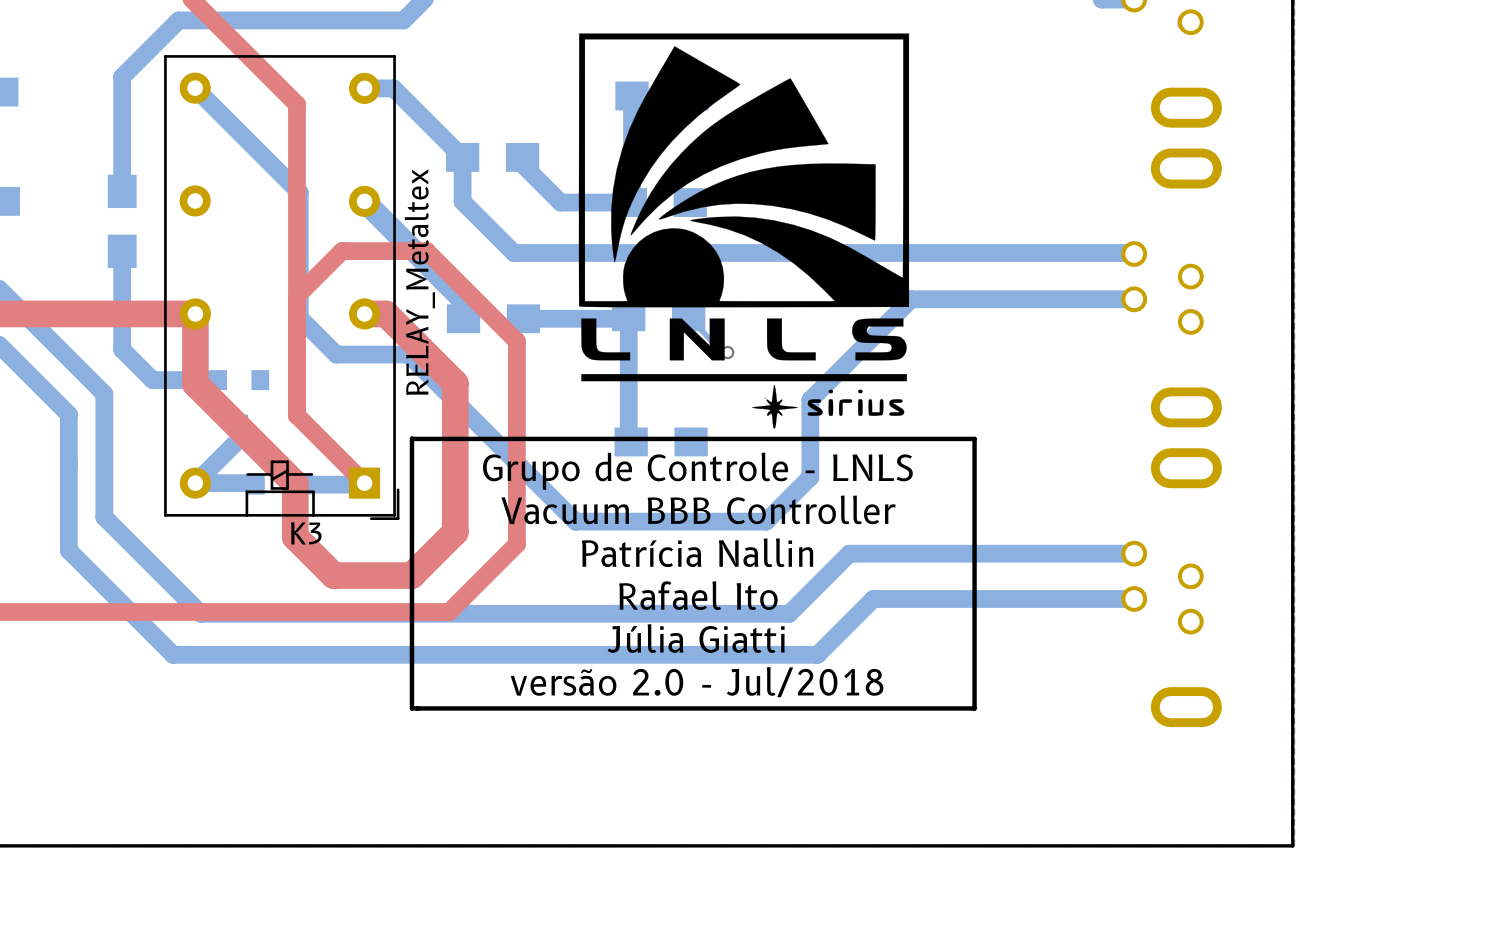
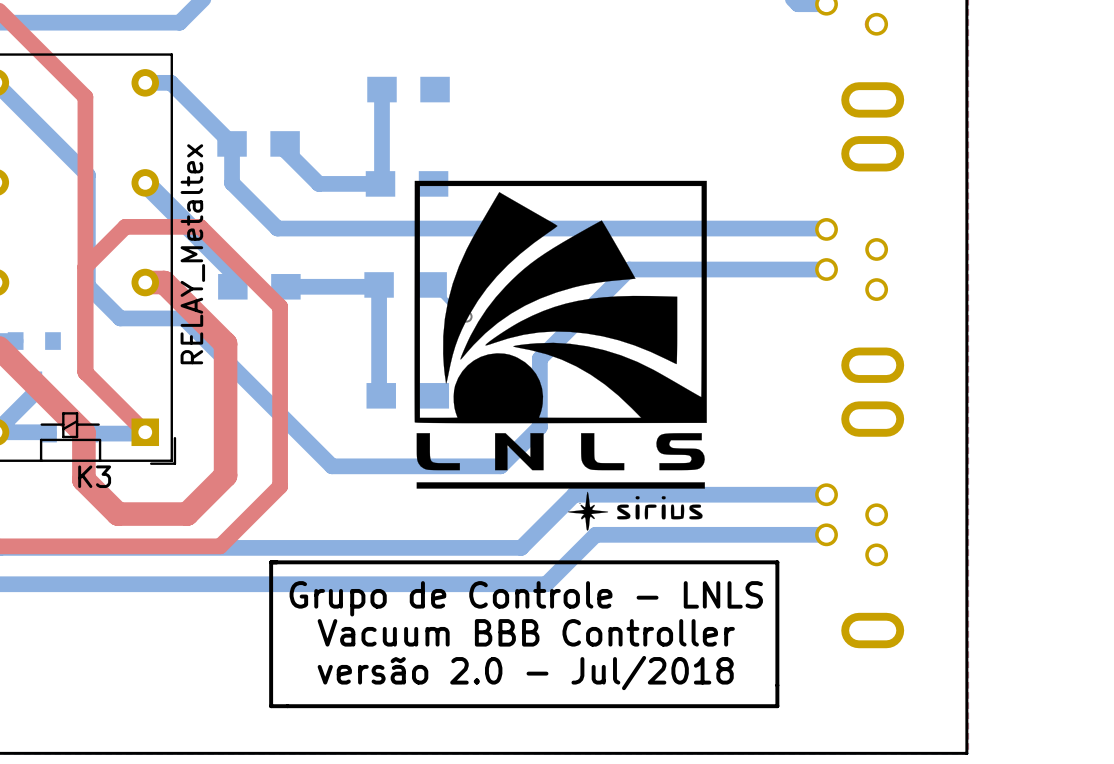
drawing position: (743, 231) -> (560, 355)
line: (411, 438) (411, 708) (974, 708) (974, 438) (412, 438) -> none
text position: Grupo de Controle - LNLS (697, 471) -> Grupo de Controle - LNLS (526, 598)
text position: Vacuum BBB Controller (698, 509) -> Vacuum BBB Controller (526, 632)
text: Patrícia Nallin (697, 552) -> none
text: Rafael Ito (698, 595) -> none
line: none -> (271, 562) (777, 562) (777, 706) (271, 706) (271, 562)
text: Júlia Giatti (696, 638) -> none
text position: versão 2.0 - Jul/2018 (697, 682) -> versão 2.0 - Jul/2018 (525, 673)

